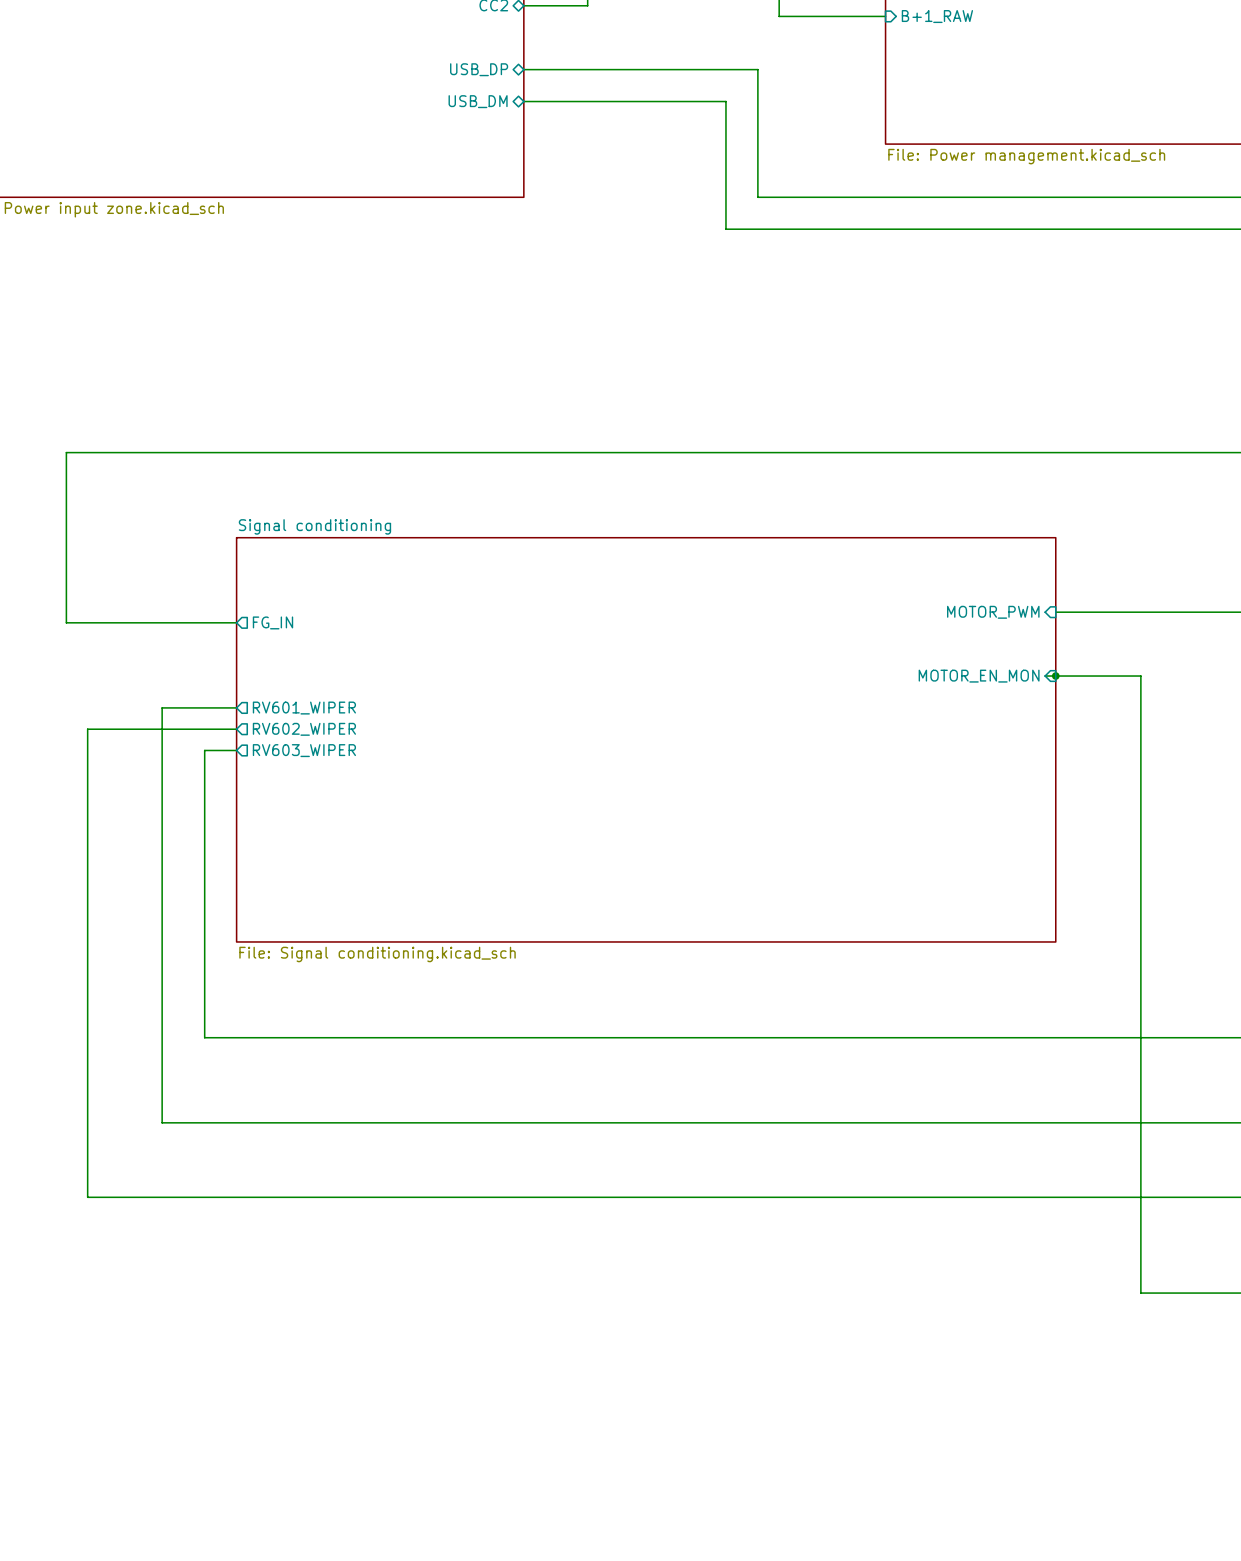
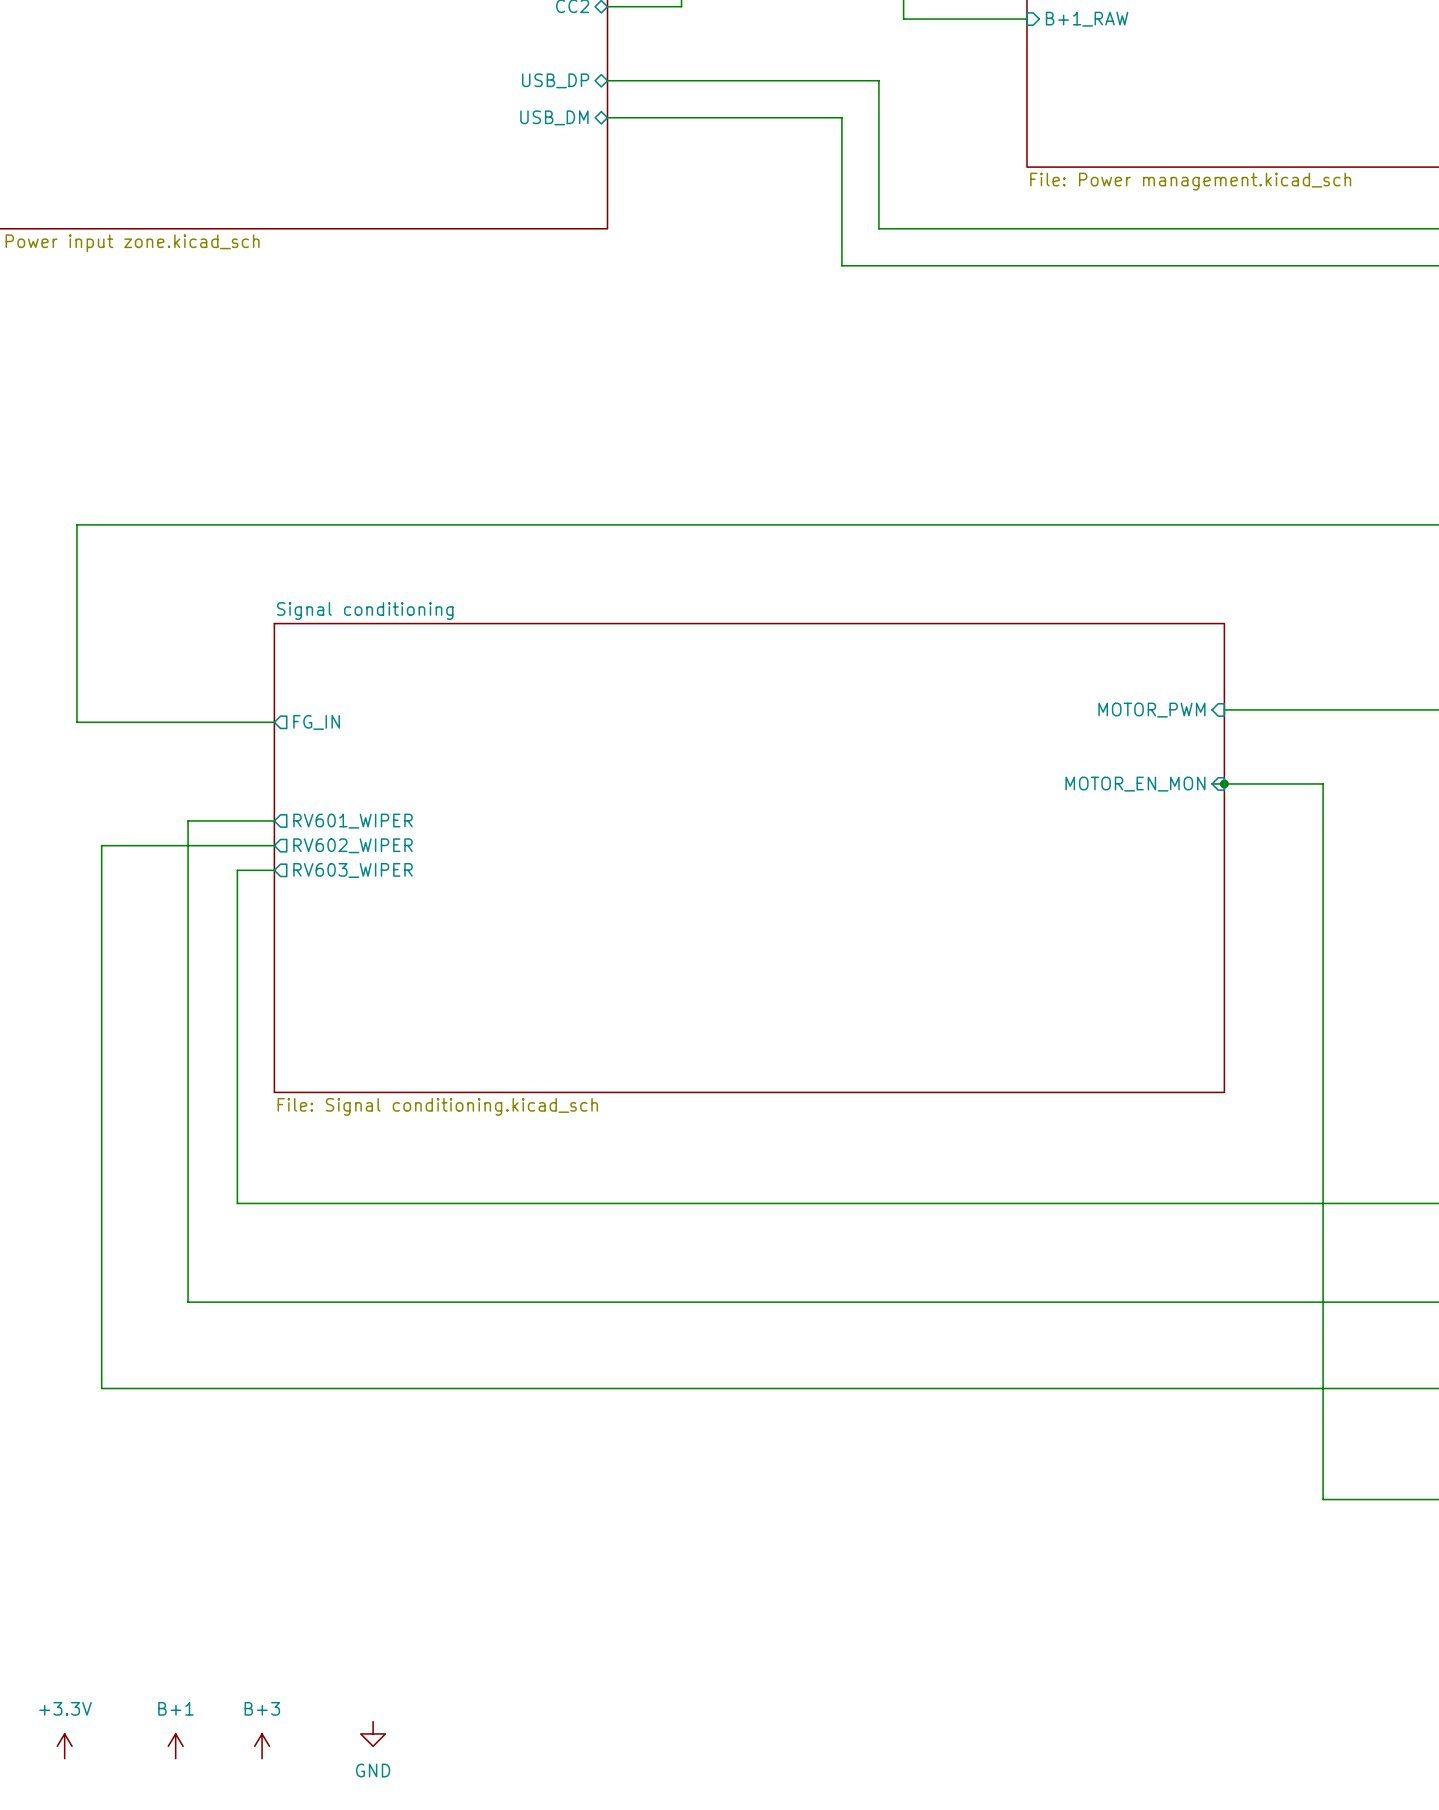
power symbol: none -> GND (373, 1733)
power symbol: none -> +3.3V (64, 1746)
power symbol: none -> B+1 (175, 1746)
power symbol: none -> B+3 (262, 1746)

